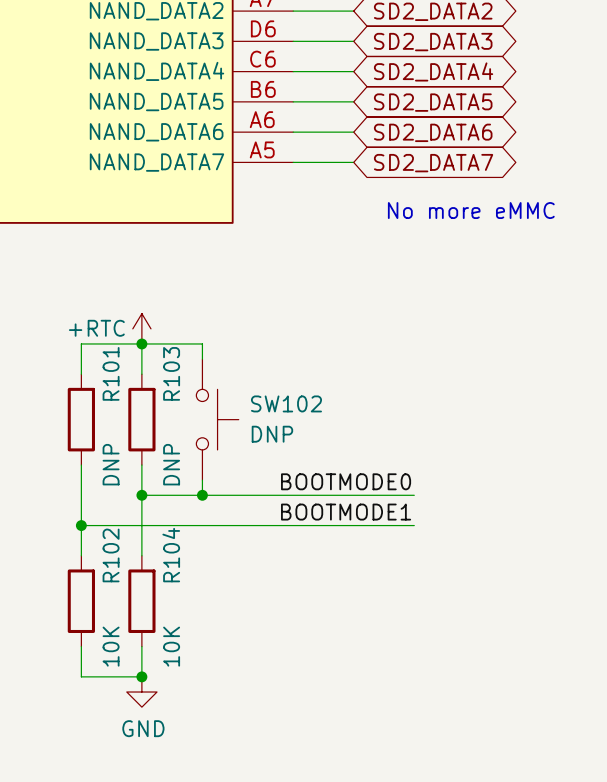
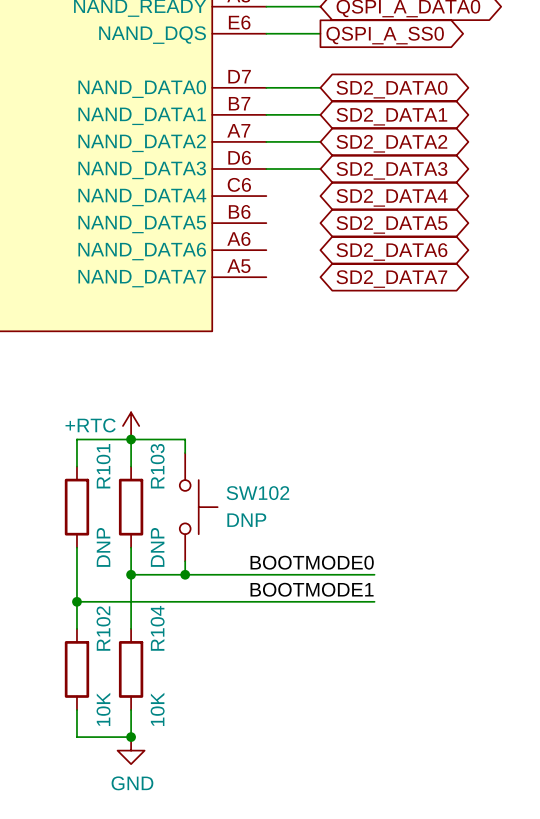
wire: (293, 71) (353, 71) -> none
wire: (293, 101) (353, 101) -> none
wire: (293, 132) (353, 132) -> none
wire: (293, 162) (353, 162) -> none
text: No more eMMC (471, 210) -> none

